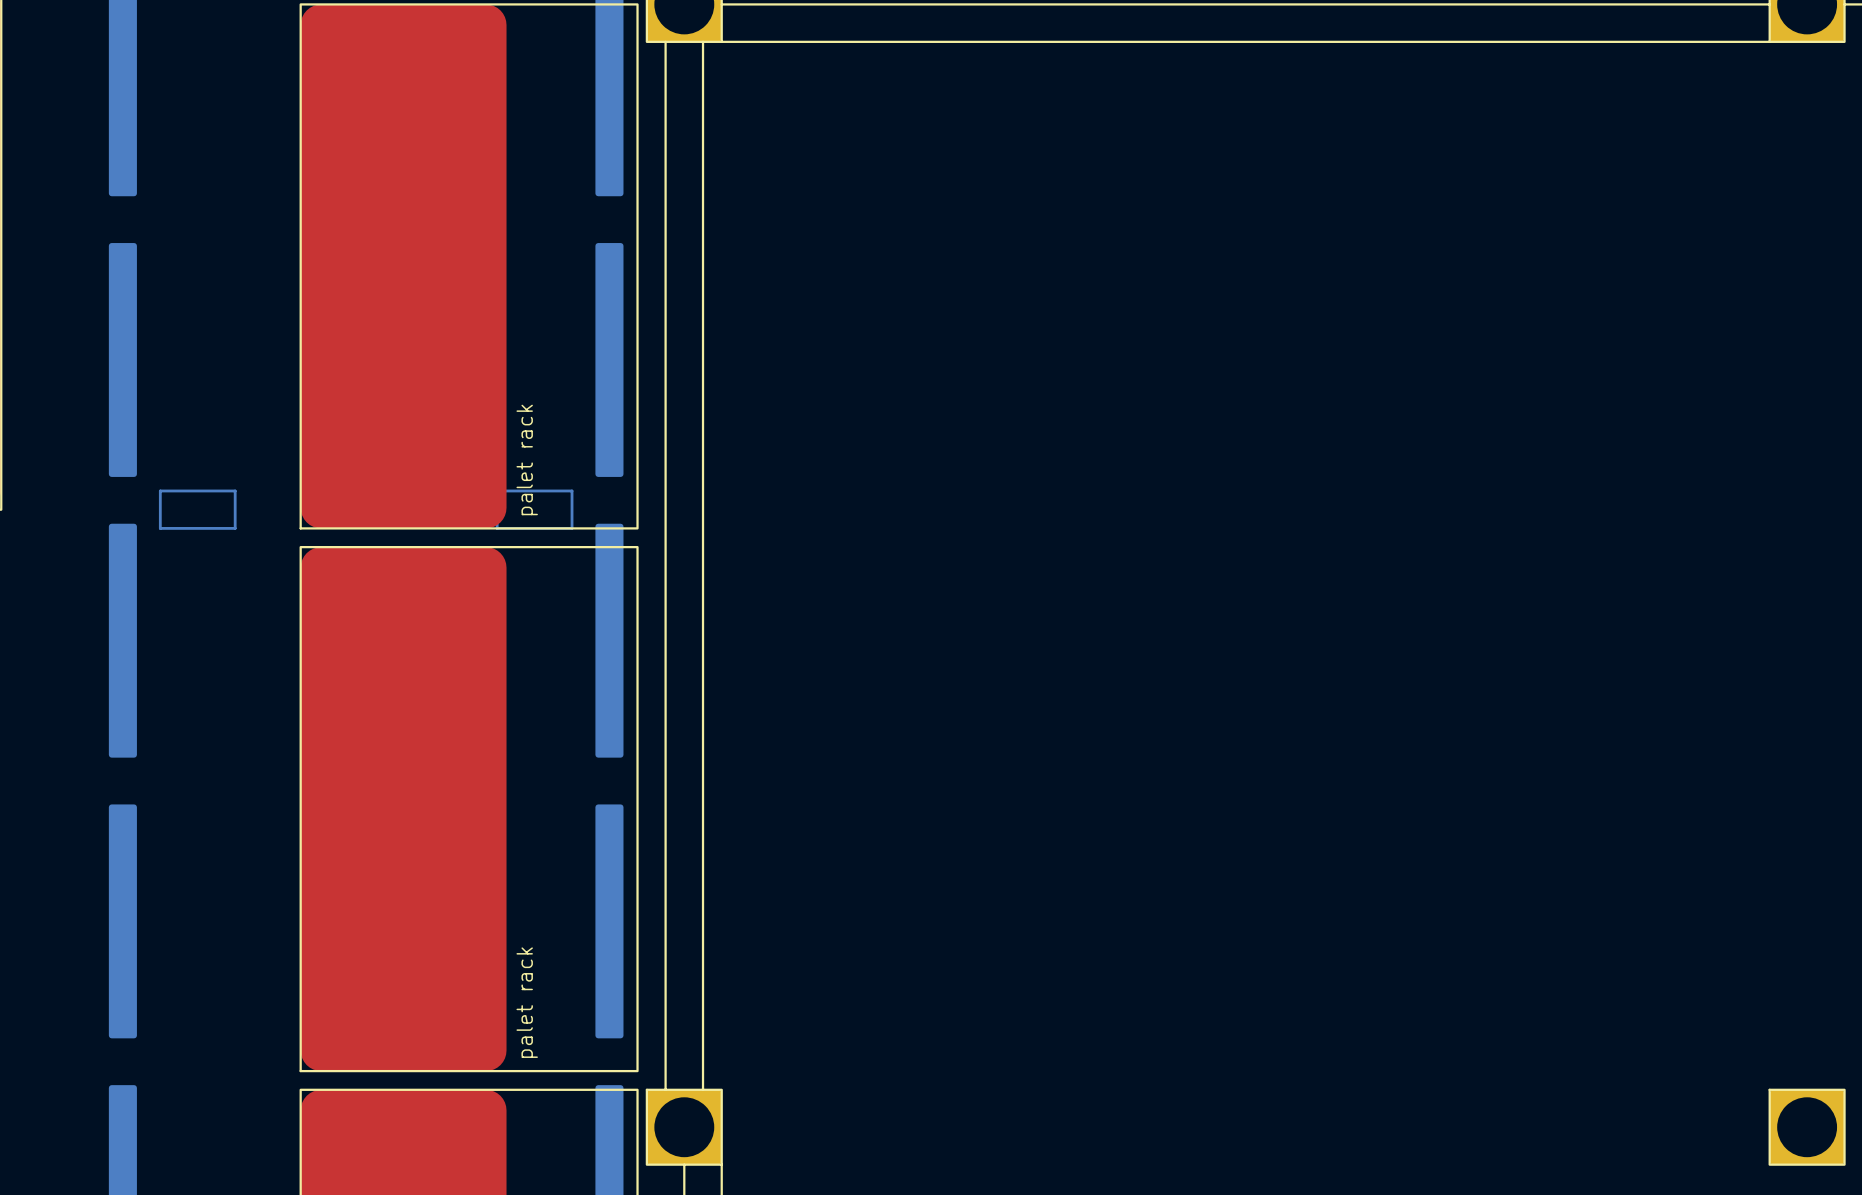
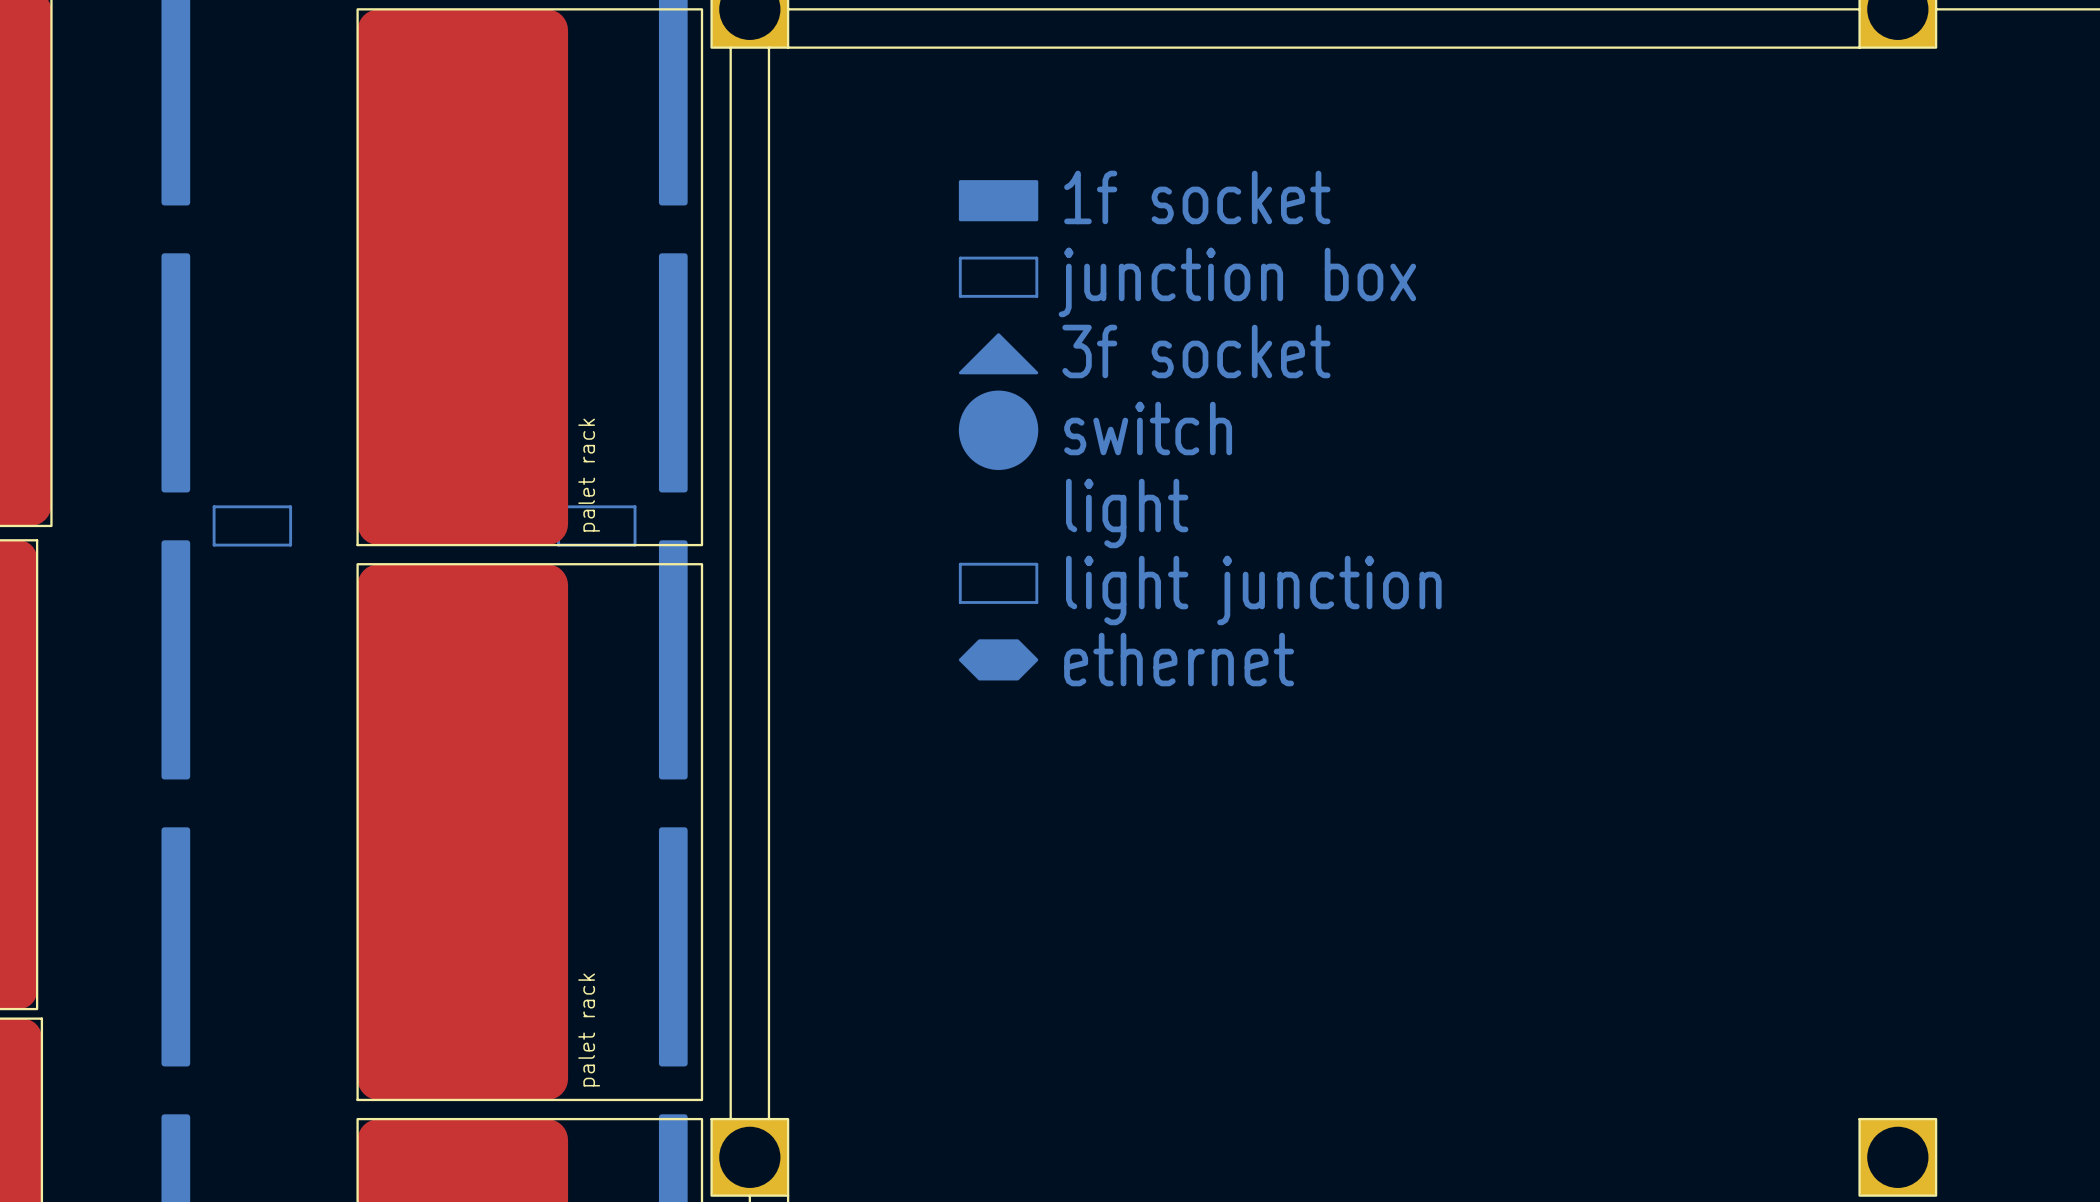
drawing: none -> [958, 180, 1039, 222]
text: none -> 1f socket (1197, 197)
bottom track: none -> (960, 258) (960, 296) (1036, 296) (1036, 258) (960, 258)
text: none -> junction box (1237, 282)
drawing: none -> [958, 333, 1039, 470]
text: none -> 3f socket (1196, 351)
text: none -> switch (1148, 428)
text: none -> light (1127, 513)
bottom track: none -> (960, 564) (1036, 564) (1036, 602) (960, 602) (960, 564)
text: none -> light junction (1253, 590)
drawing: none -> [958, 639, 1039, 681]
text: none -> ethernet (1179, 659)

